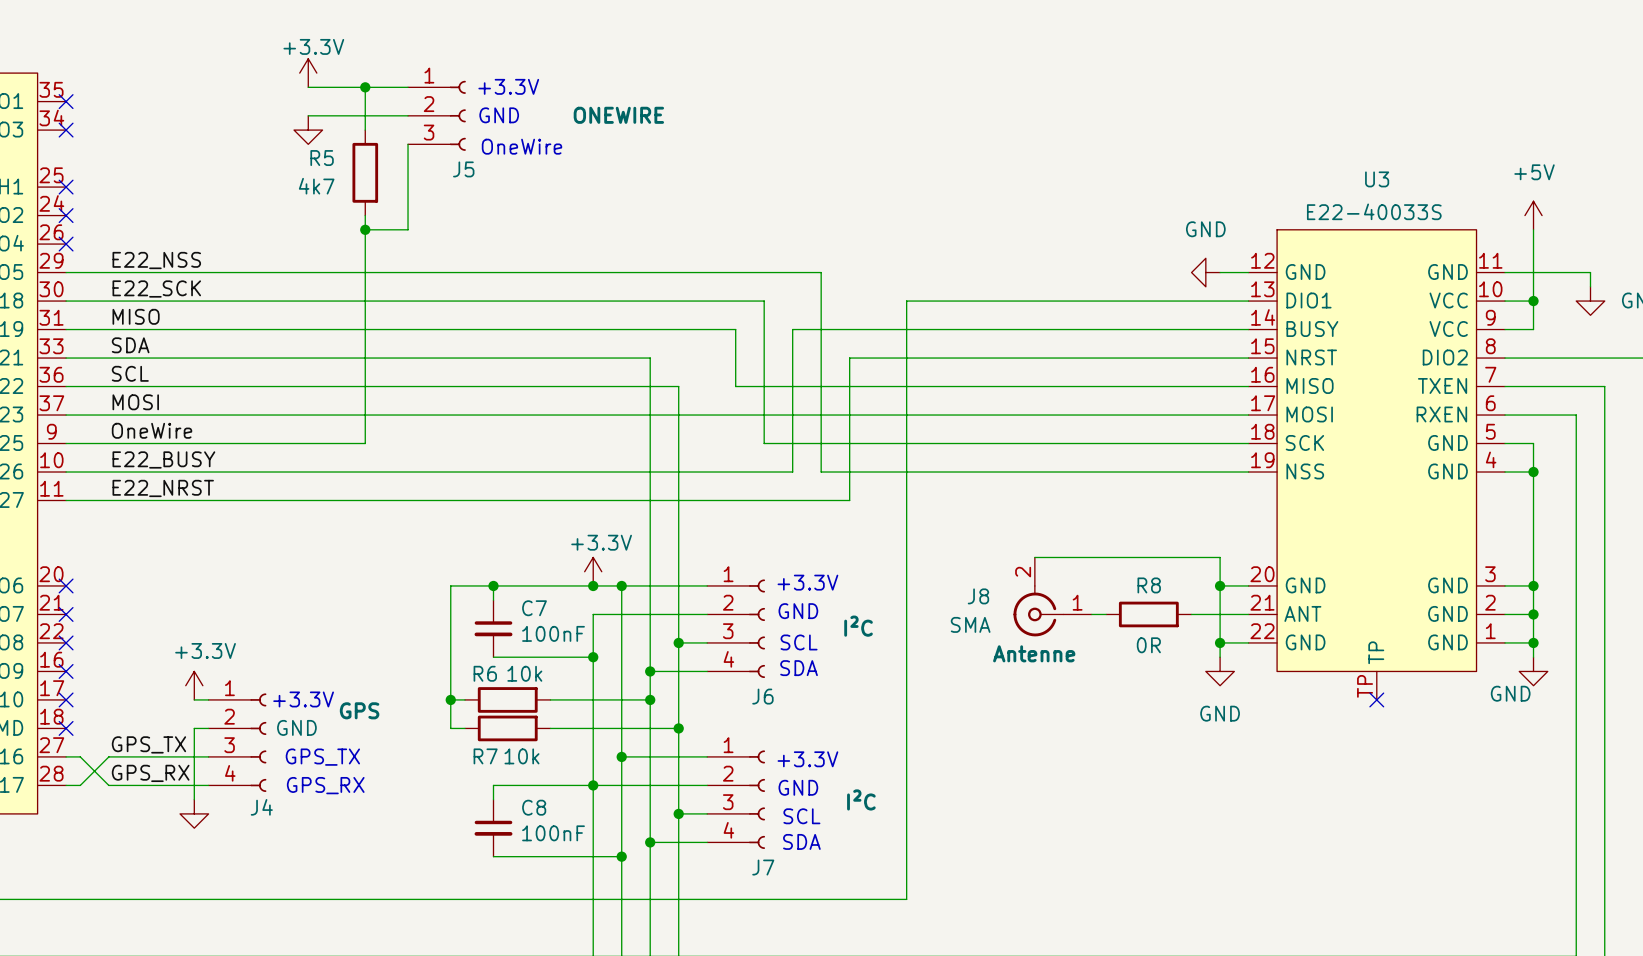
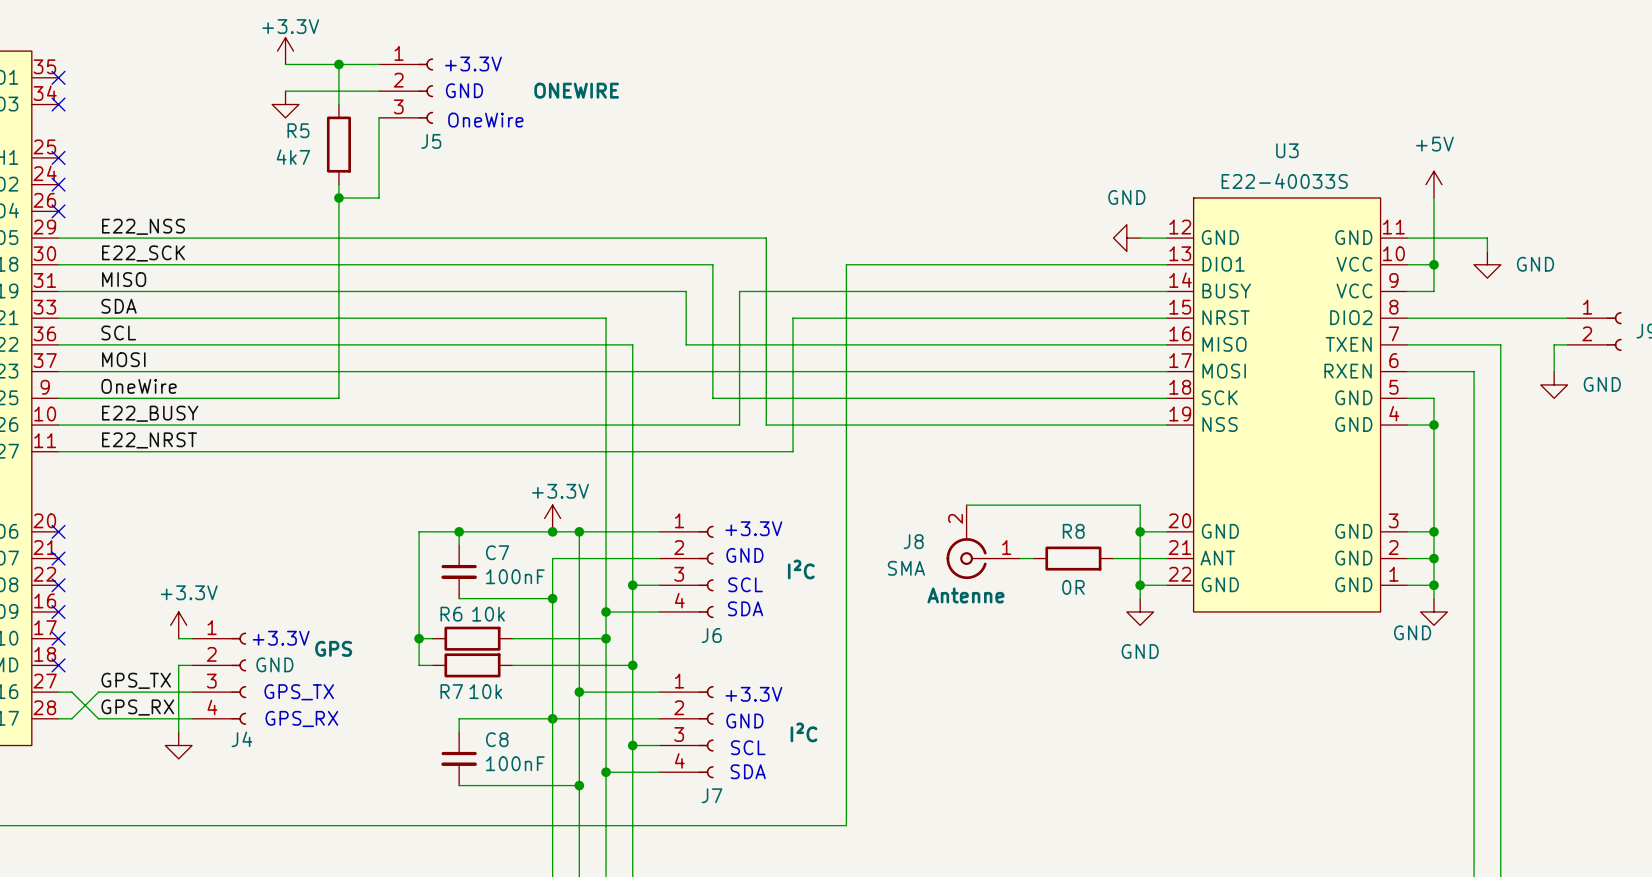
U3 symbol: [1248, 229, 1506, 700] -> [1166, 198, 1408, 612]
no-connect mark: (1376, 699) -> none

